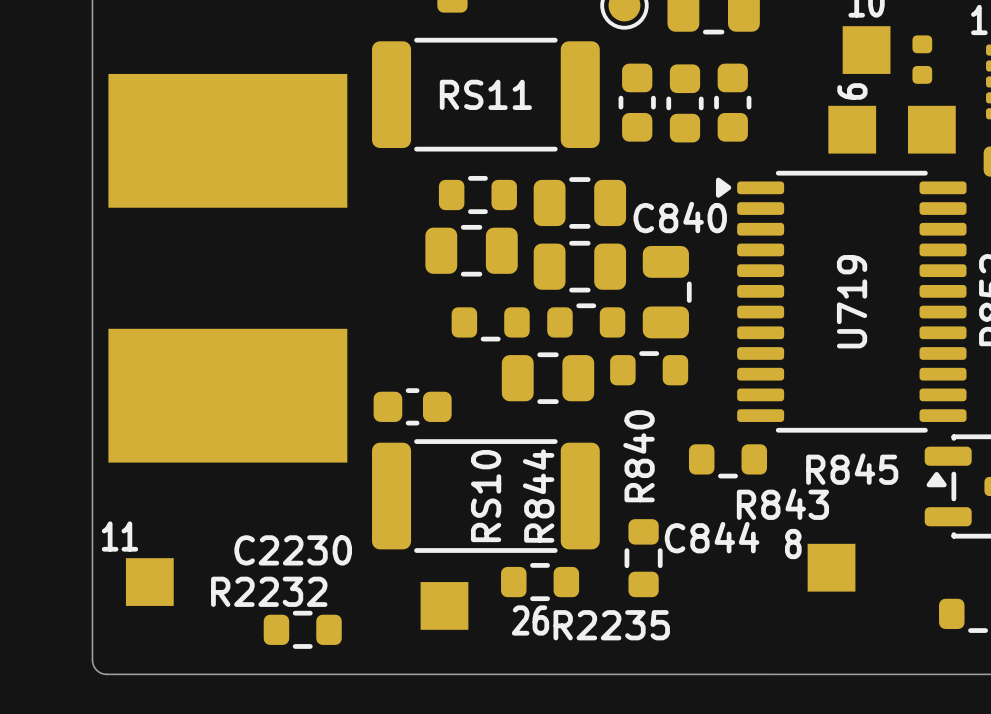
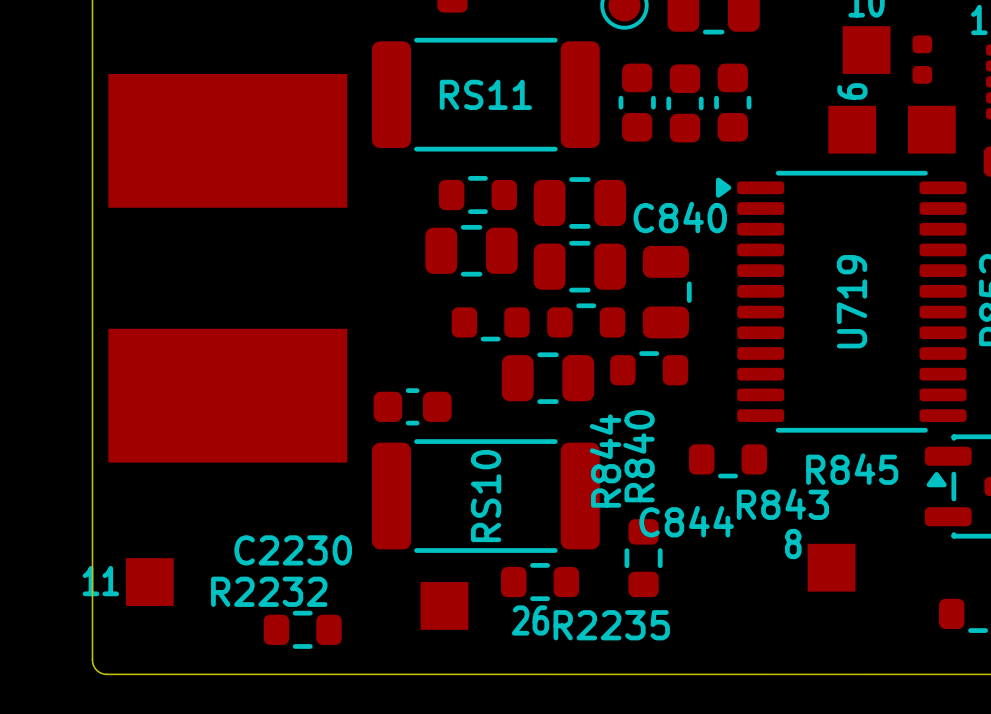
R844 name position: R844 (538, 496) -> R844 (605, 460)
part text position: 11 (119, 536) -> 11 (100, 581)
C844 name position: C844 (712, 537) -> C844 (686, 521)

